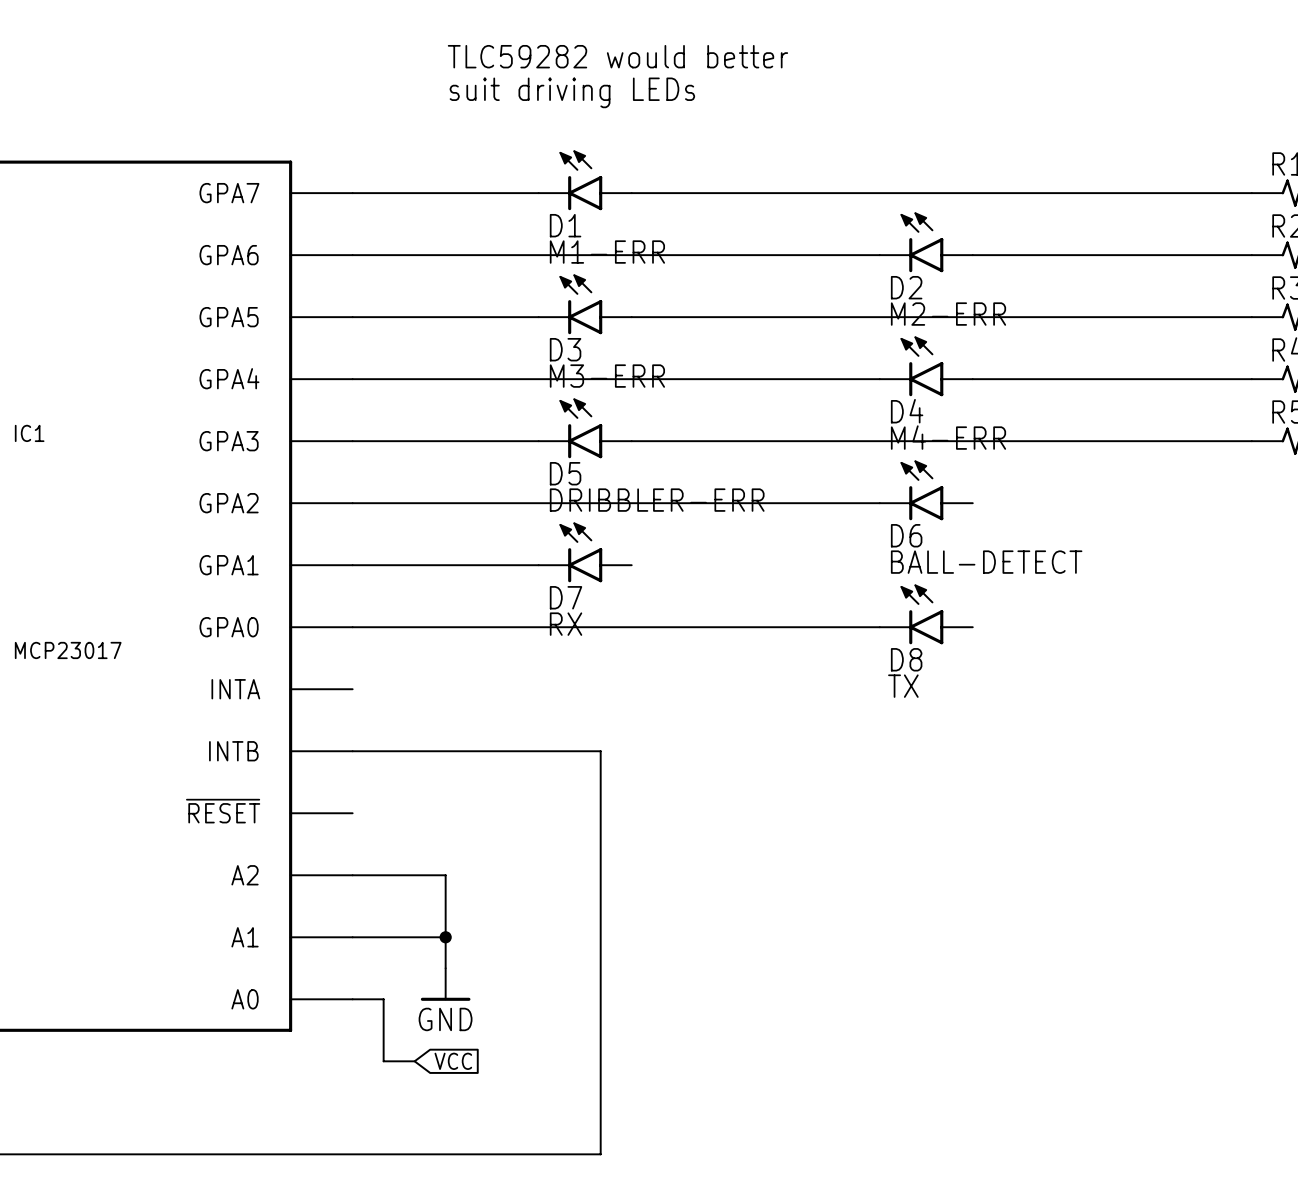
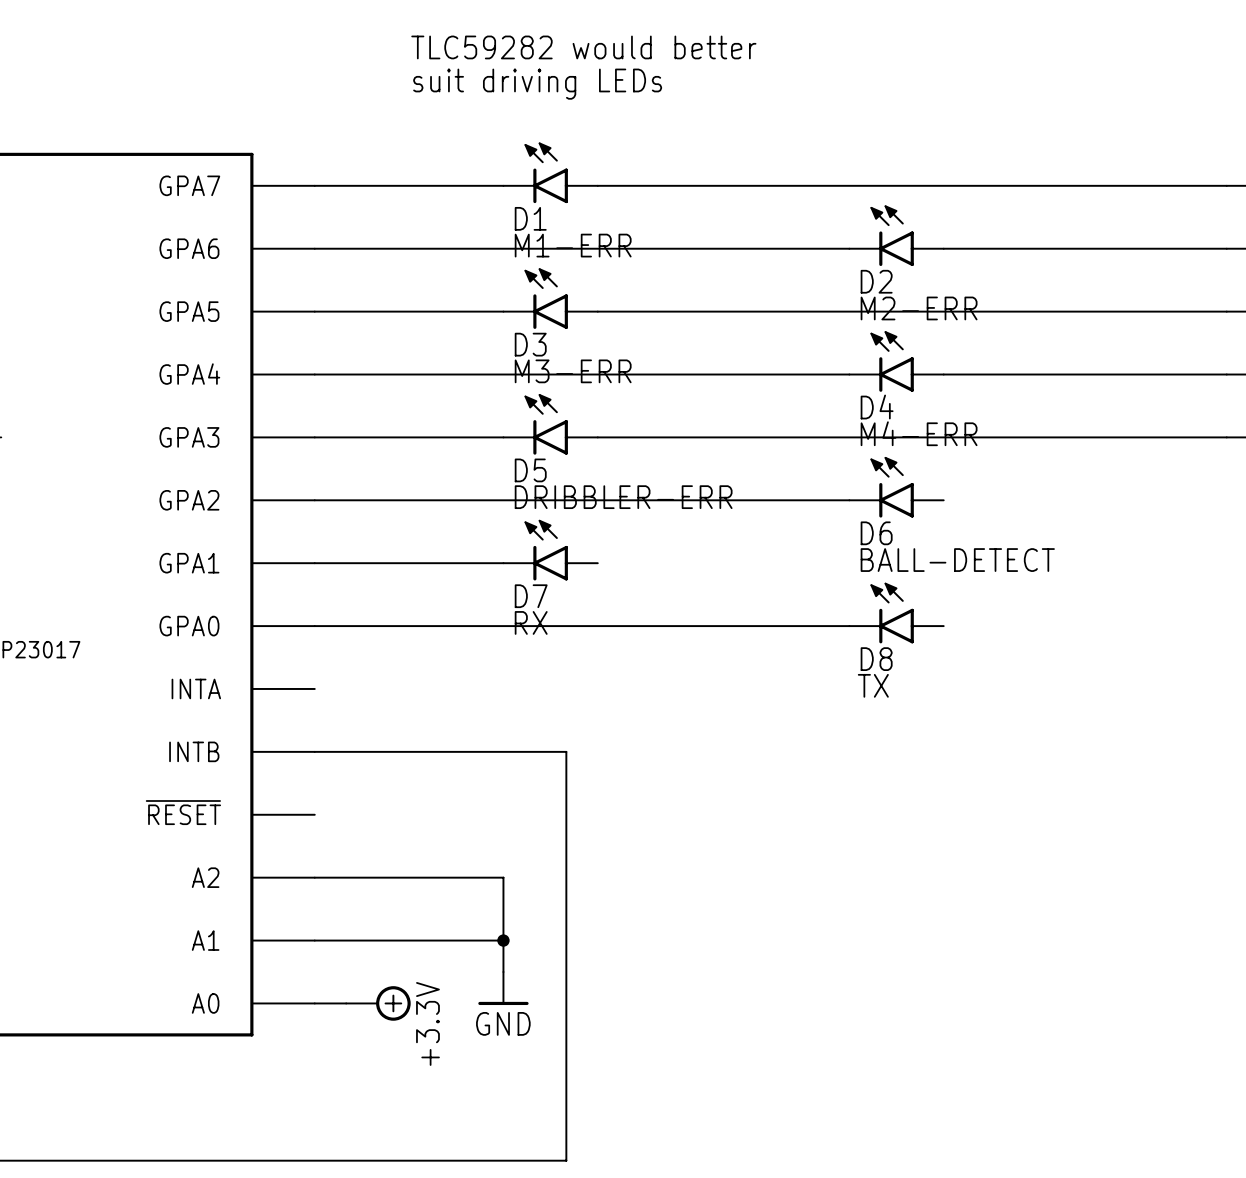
wire: (445, 875) (445, 968) -> (409, 877) (503, 877) (503, 972)
wire: none -> (409, 940) (503, 940)
junction: (445, 937) -> none
junction: none -> (503, 940)
power symbol position: GND (445, 984) -> GND (503, 988)
wire: (383, 999) (383, 1061) (414, 1061) -> none
power symbol: none -> +3.3V (378, 1003)
global label: VCC (453, 1061) -> none

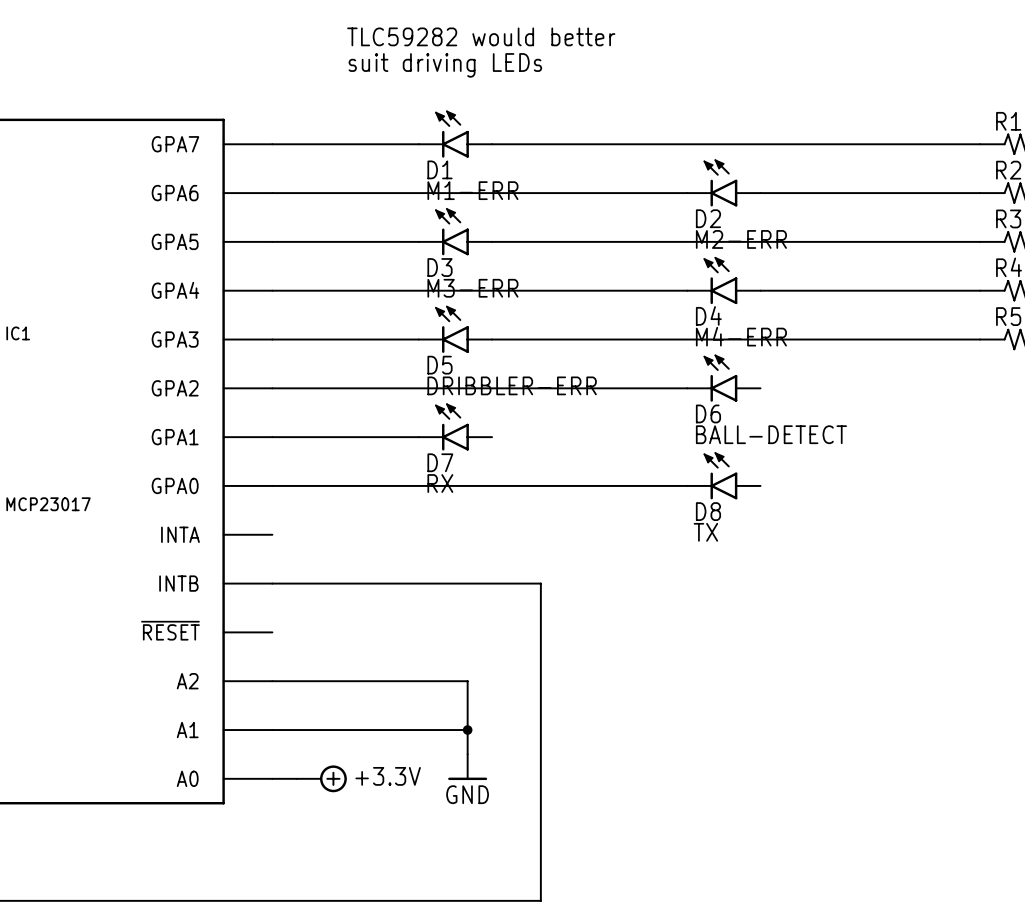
wire: (566, 751) (566, 877) -> none
wire: (503, 877) (503, 972) -> (418, 681) (467, 681)
wire: none -> (418, 730) (467, 730)
junction position: (503, 940) -> (467, 730)
wire: (566, 972) (566, 1160) -> (467, 583) (540, 583) (540, 900) (467, 900)
power symbol position: GND (503, 988) -> GND (467, 767)
power symbol text rotation: 0° (427, 1023) -> 90° clockwise (388, 776)

